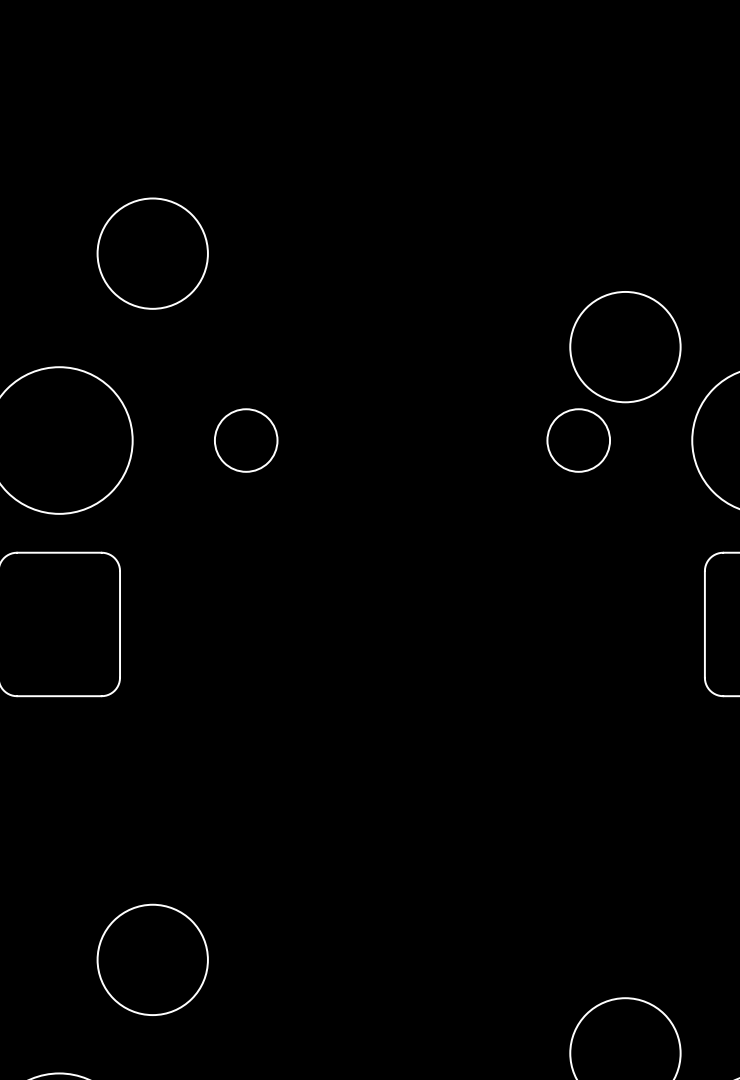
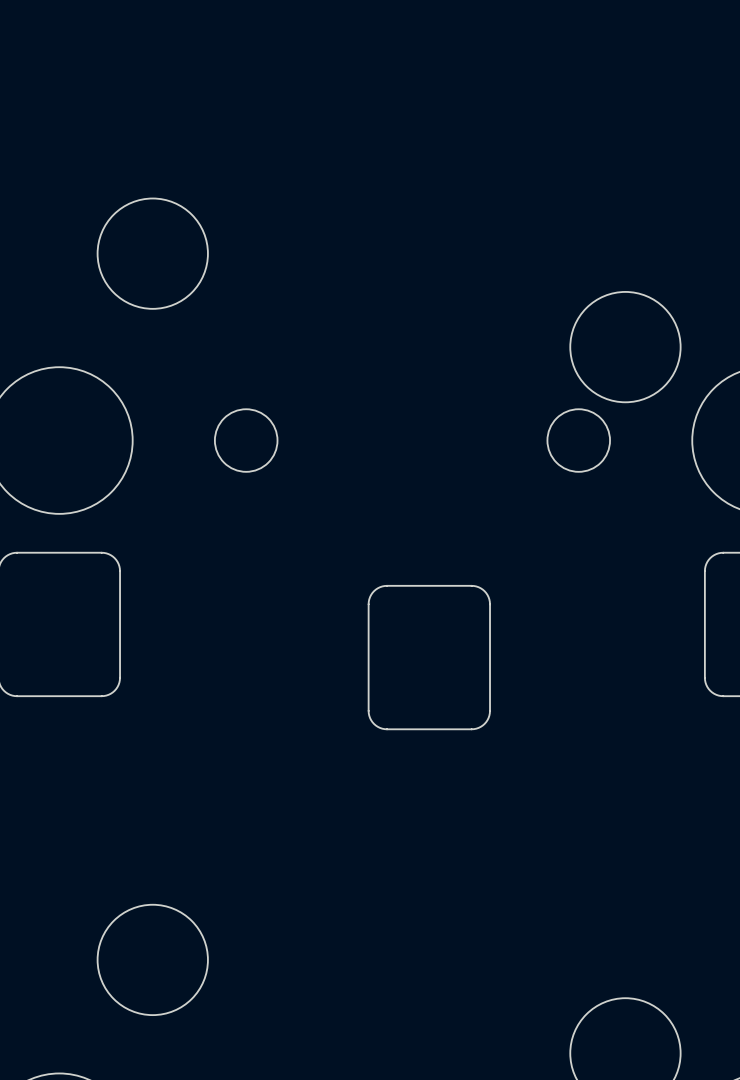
part: none -> (429, 657)

